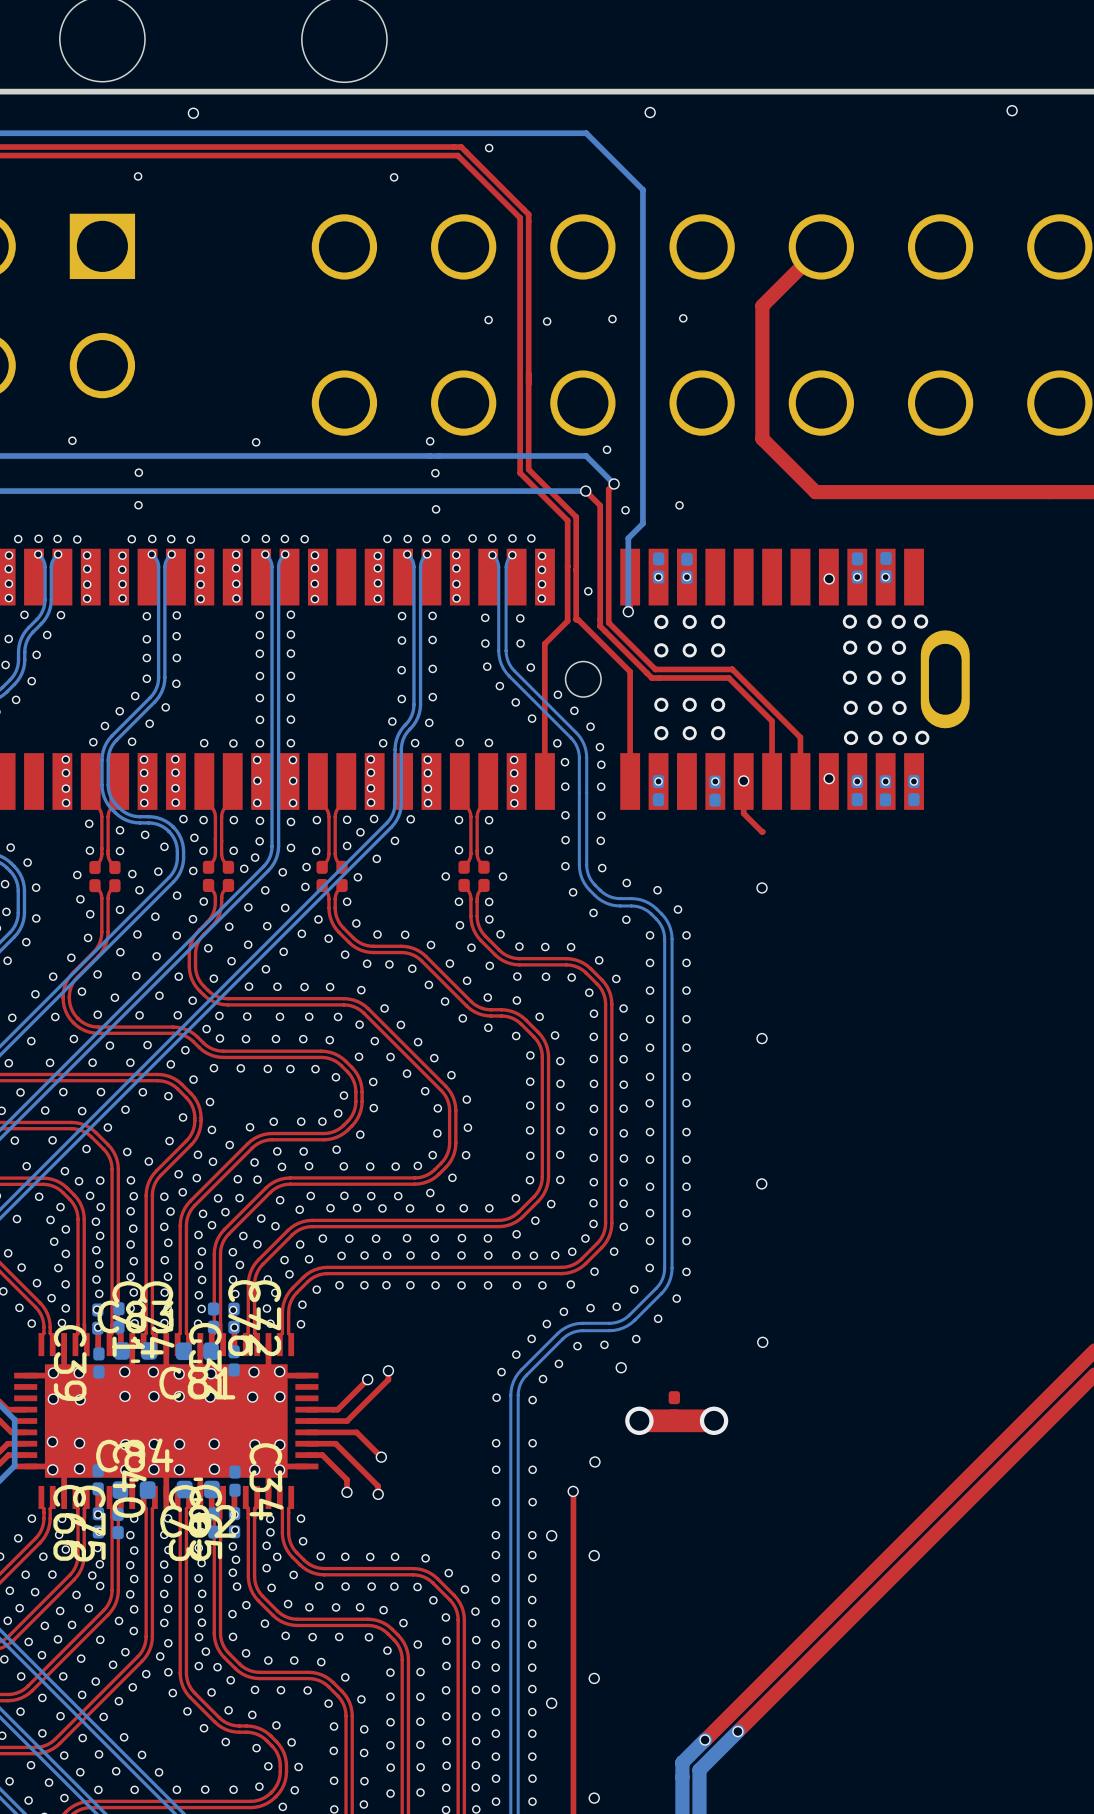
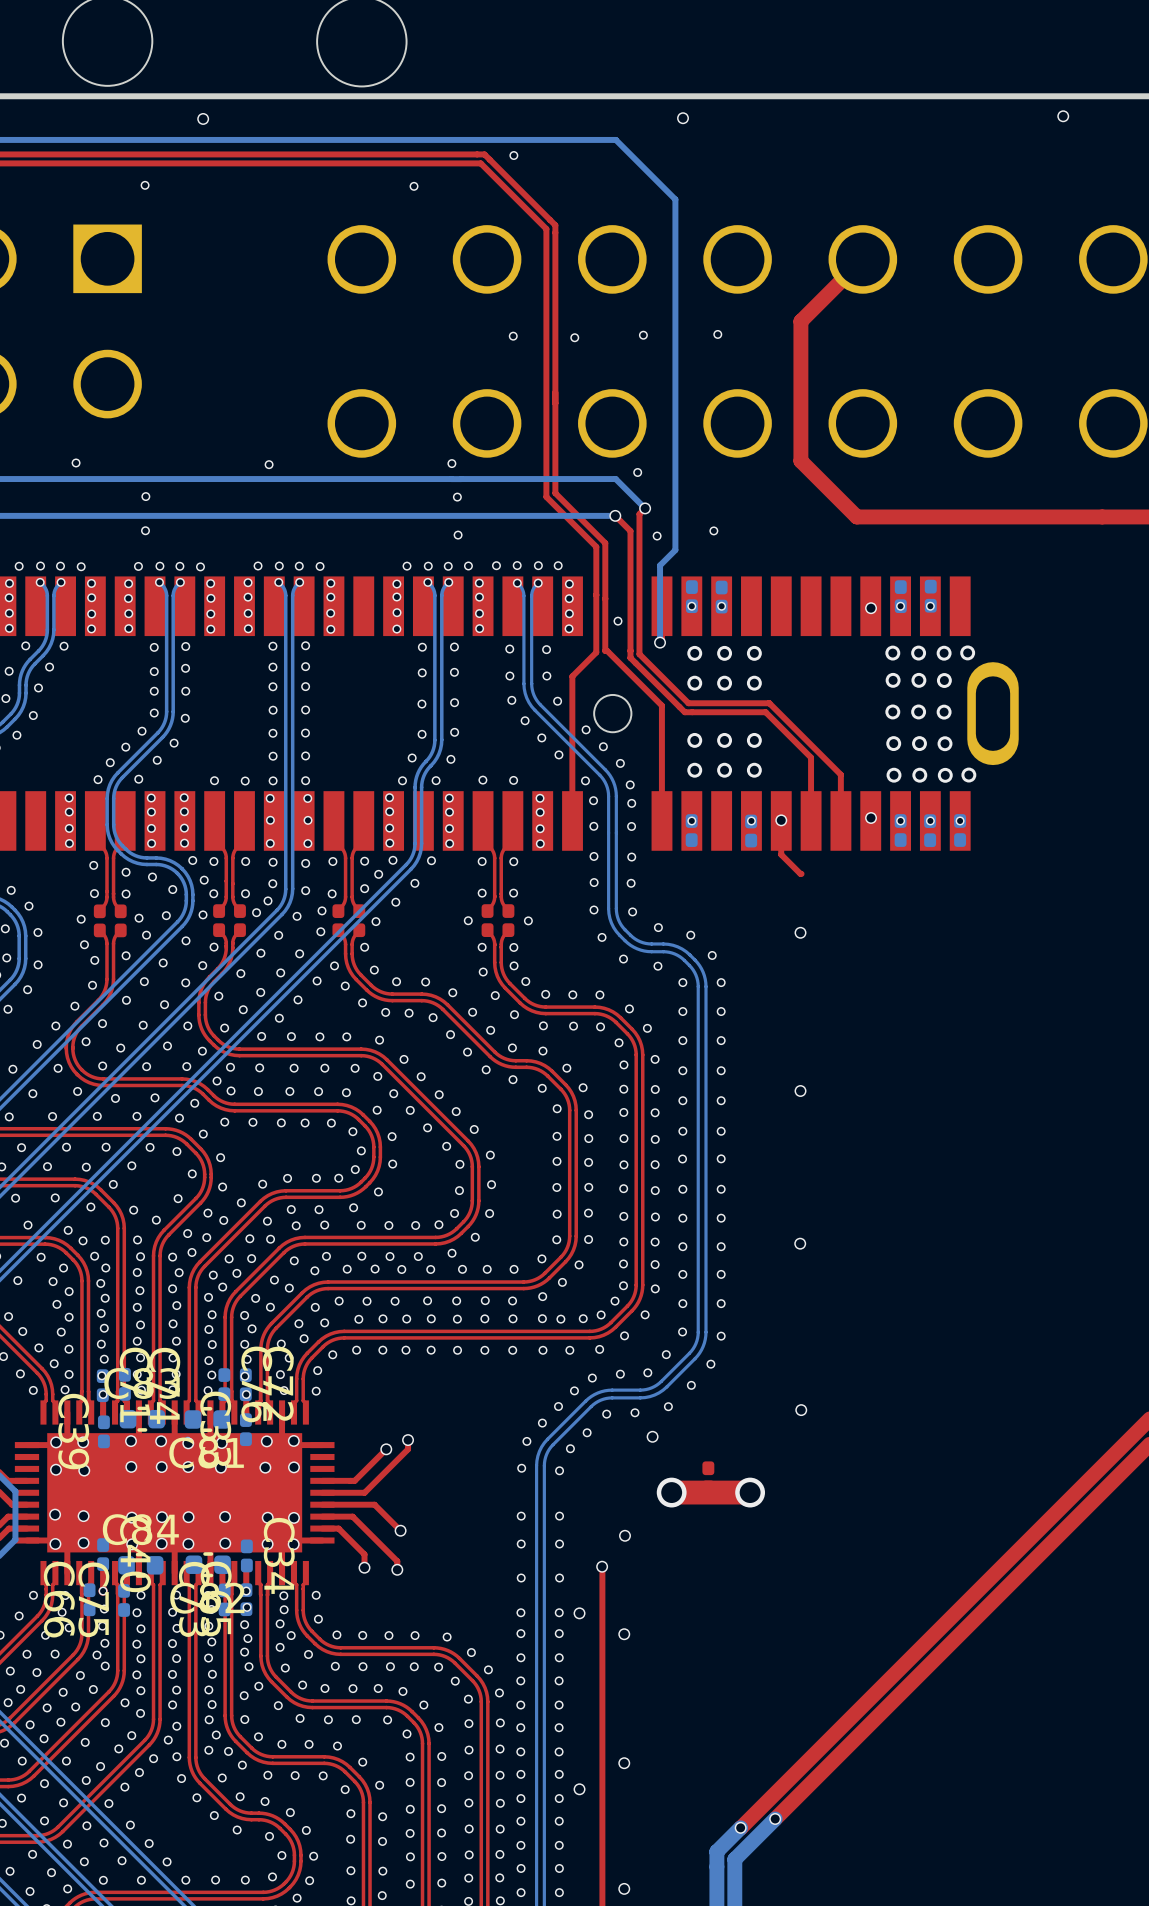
C66 position: (98, 1522) -> (89, 1599)

